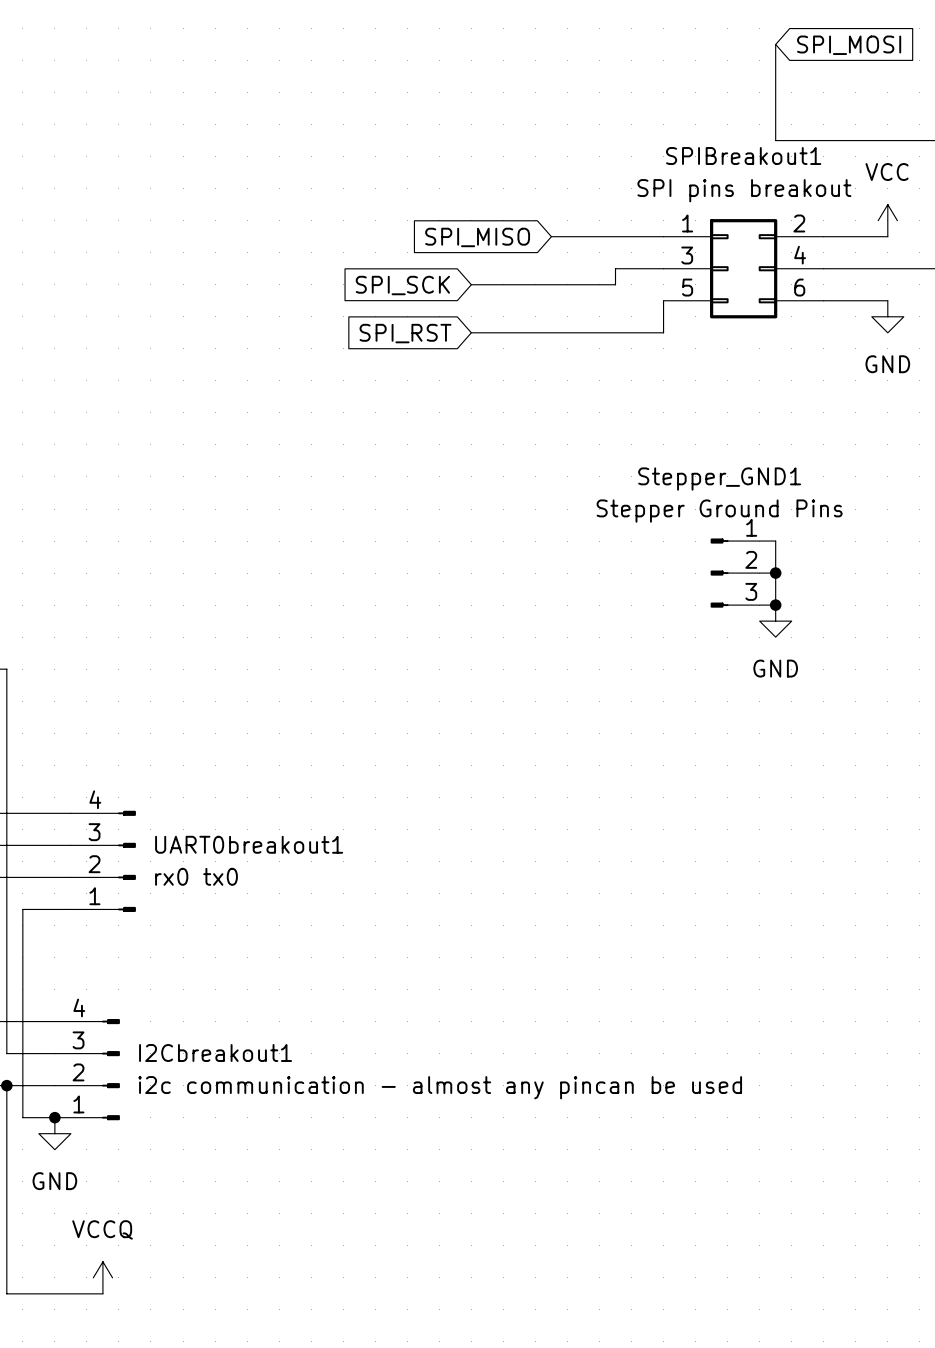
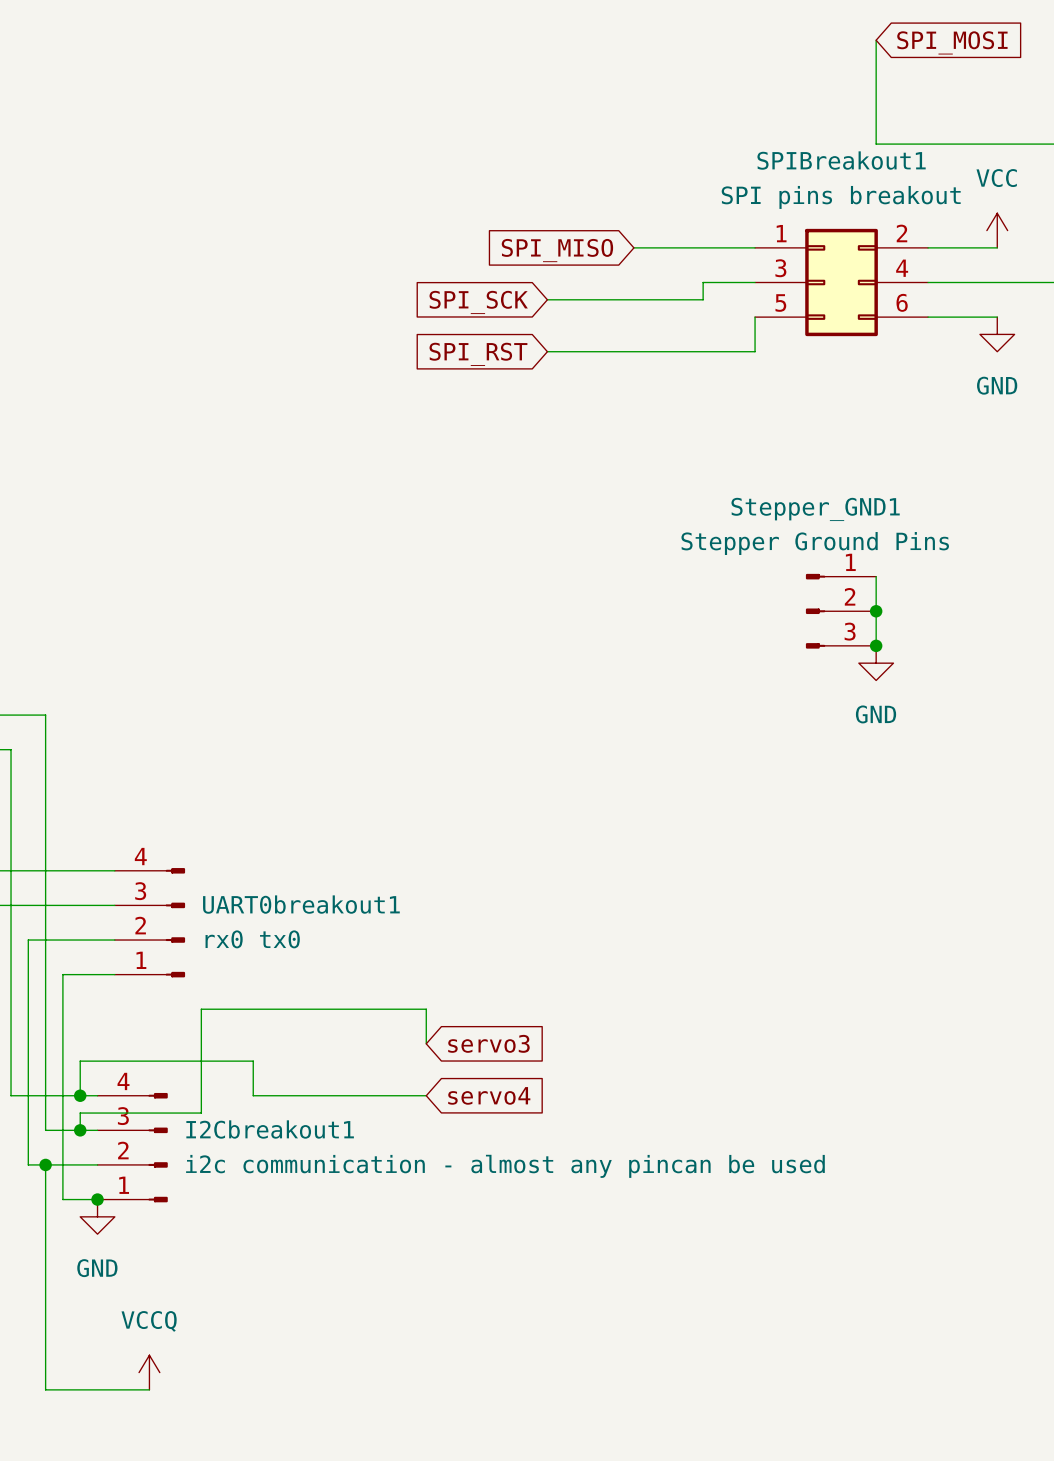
wire: none -> (426, 1043) (426, 1009) (201, 1009) (201, 1113) (80, 1113) (80, 1130)
global label: none -> servo3 (488, 1043)
wire: none -> (80, 1095) (80, 1061) (253, 1061) (253, 1095) (426, 1095)
junction: none -> (80, 1095)
global label: none -> servo4 (489, 1095)
junction: none -> (80, 1130)

